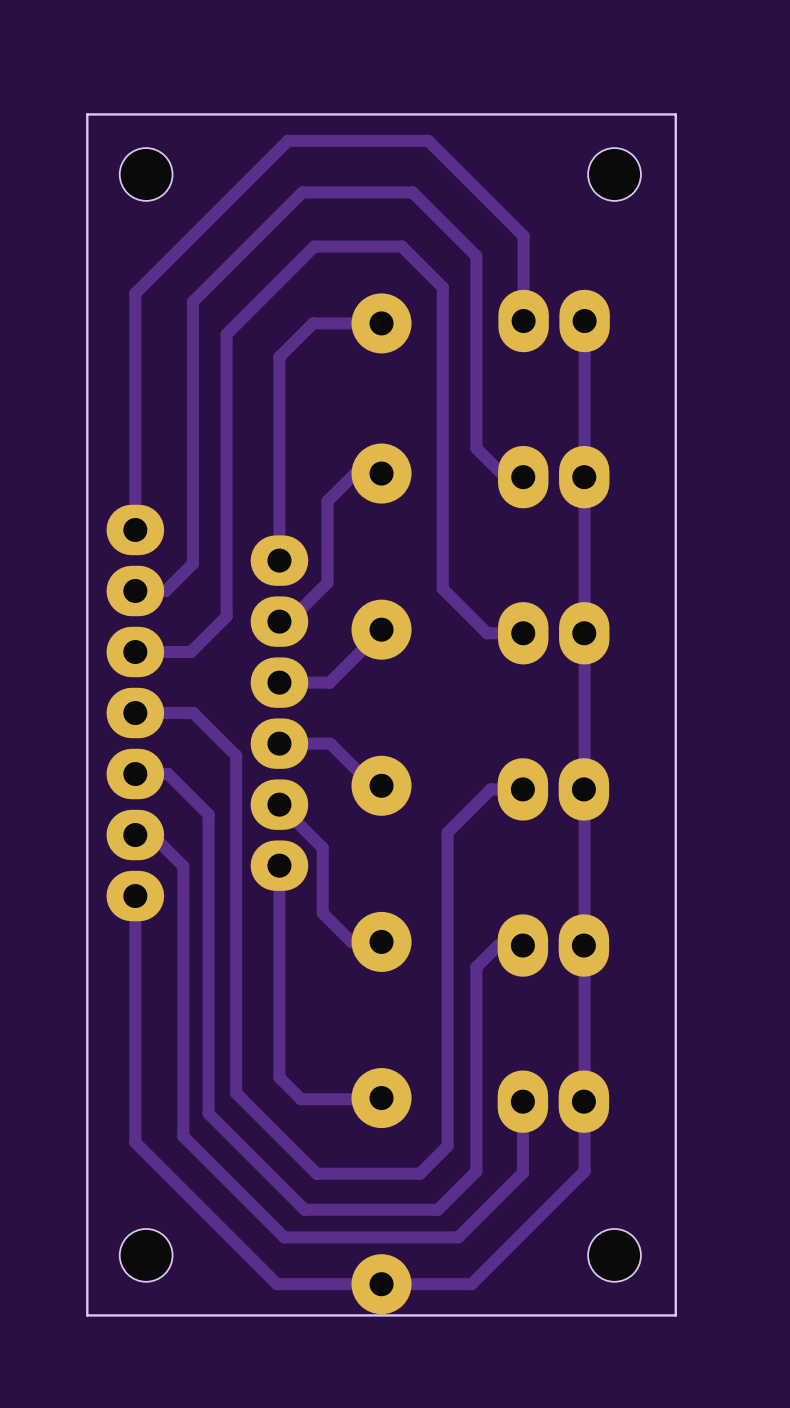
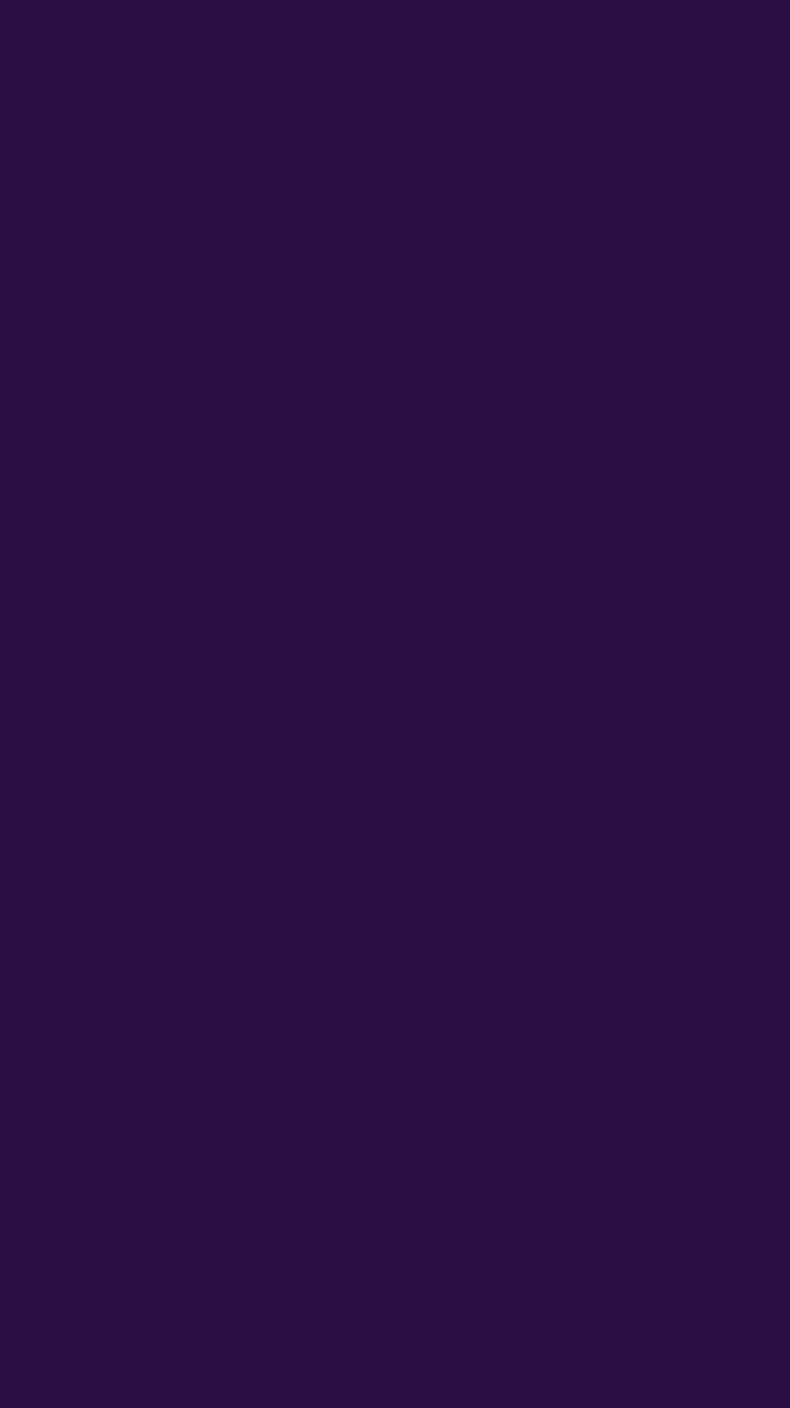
board edge: (675, 114) (87, 114) (87, 1315) (675, 1315) (675, 114) -> none
part: (146, 174) -> none
part: (614, 174) -> none
track: (523, 321) (523, 236) (428, 140) (287, 140) (135, 293) (135, 529) -> none
part: (554, 321) -> none
track: (584, 321) (584, 1171) (471, 1284) (277, 1284) (135, 1142) (135, 896) -> none
track: (381, 323) (313, 323) (279, 357) (279, 560) -> none
part: (381, 323) -> none
track: (381, 473) (355, 473) (327, 501) (327, 582) (288, 621) (279, 621) -> none
part: (381, 473) -> none
track: (523, 477) (505, 477) (476, 448) (476, 256) (412, 192) (302, 192) (192, 301) (192, 563) (165, 590) (135, 590) -> none
part: (553, 477) -> none
part: (381, 629) -> none
track: (523, 633) (487, 633) (442, 588) (442, 287) (401, 246) (314, 246) (226, 334) (226, 616) (191, 652) (135, 652) -> none
part: (553, 633) -> none
track: (372, 638) (381, 629) (329, 682) (279, 682) -> none
track: (135, 713) (193, 713) (236, 755) (236, 1093) (316, 1173) (419, 1173) (447, 1146) (447, 832) (490, 789) (522, 789) -> none
part: (135, 713) -> none
part: (279, 713) -> none
track: (279, 743) (330, 743) (373, 786) (381, 785) -> none
track: (135, 774) (168, 774) (208, 814) (208, 1113) (304, 1209) (437, 1209) (476, 1171) (476, 967) (498, 945) (522, 945) -> none
part: (381, 785) -> none
part: (553, 789) -> none
track: (279, 804) (322, 847) (322, 913) (351, 941) (381, 941) -> none
track: (135, 835) (152, 835) (183, 866) (183, 1136) (284, 1237) (458, 1237) (522, 1172) (522, 1101) -> none
track: (279, 865) (279, 1077) (301, 1099) (381, 1098) -> none
part: (381, 941) -> none
part: (553, 945) -> none
part: (381, 1098) -> none
part: (553, 1101) -> none
part: (146, 1255) -> none
part: (614, 1255) -> none
part: (381, 1284) -> none

